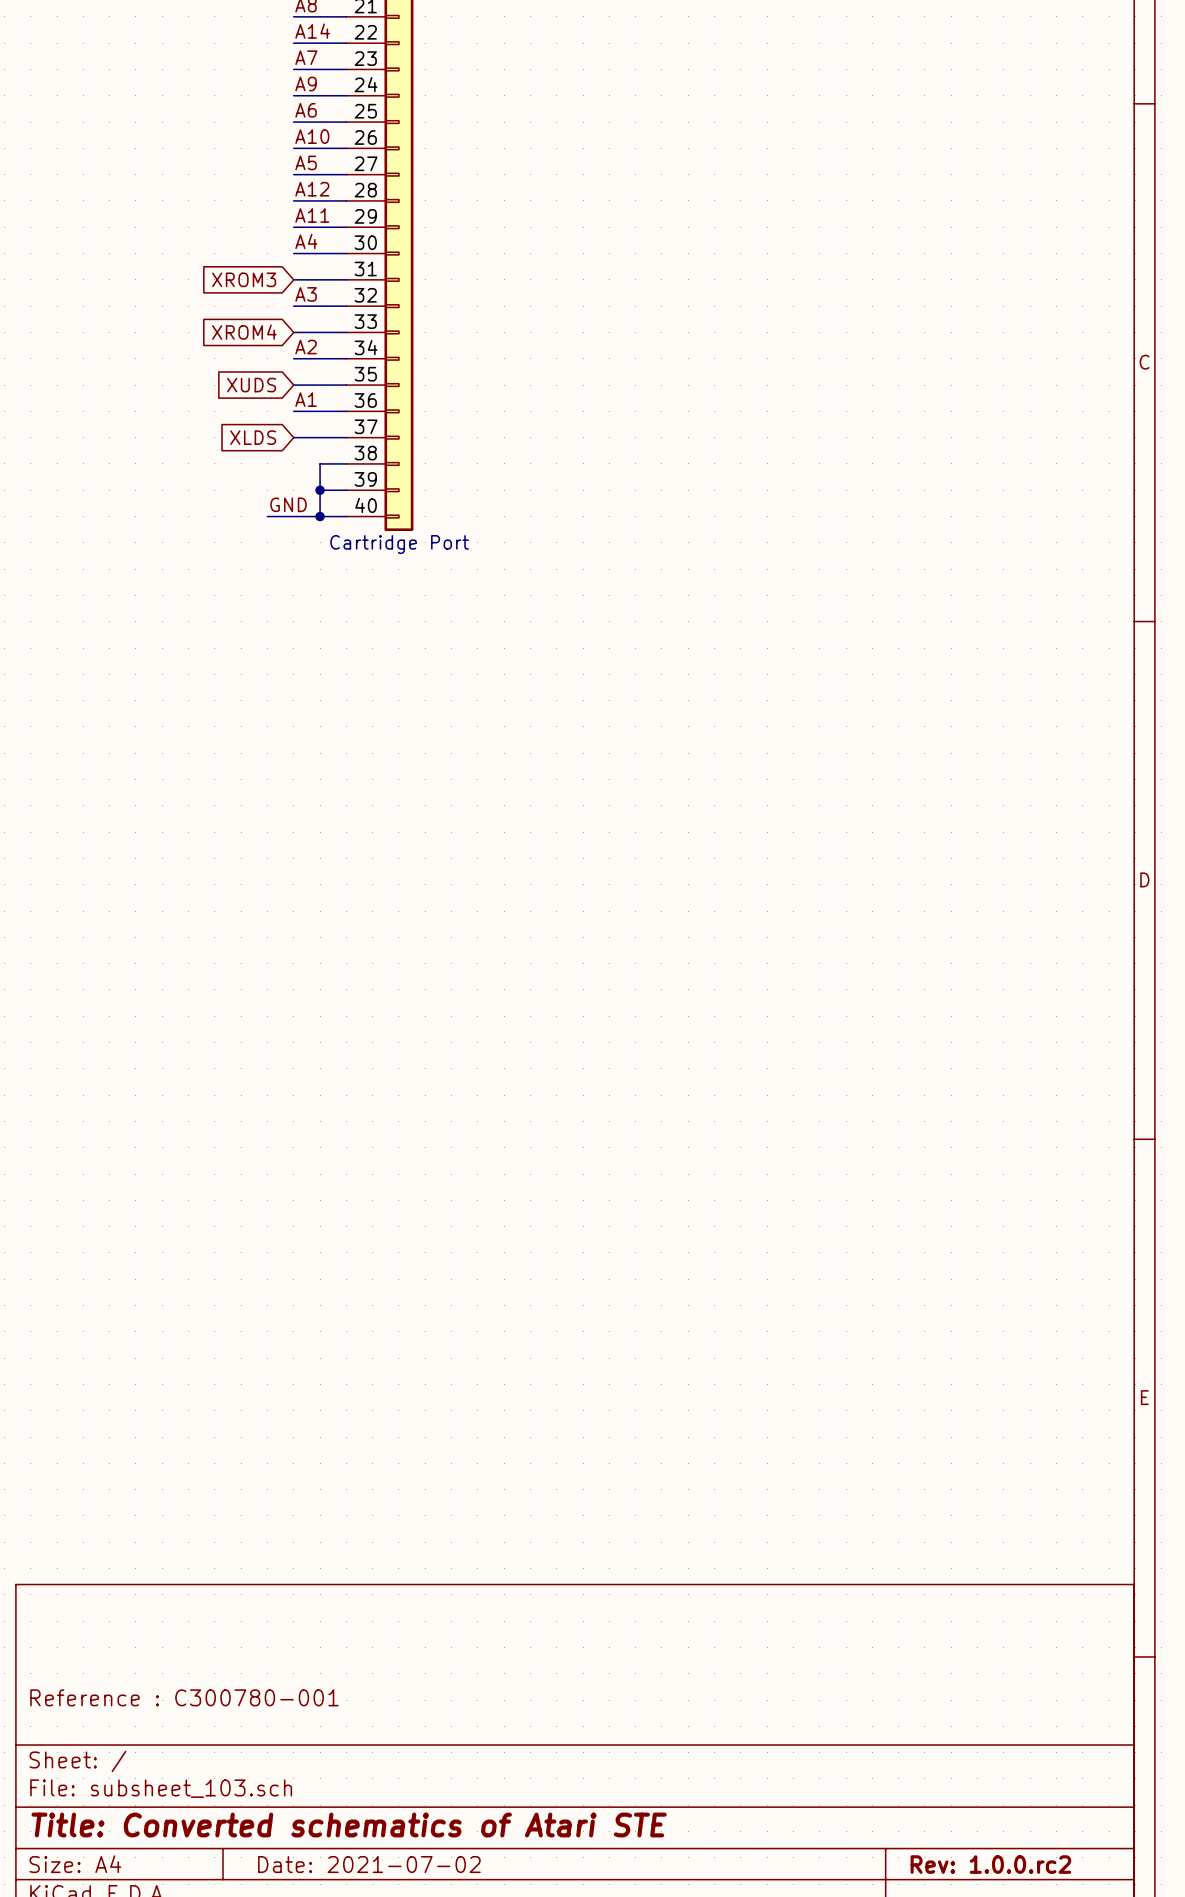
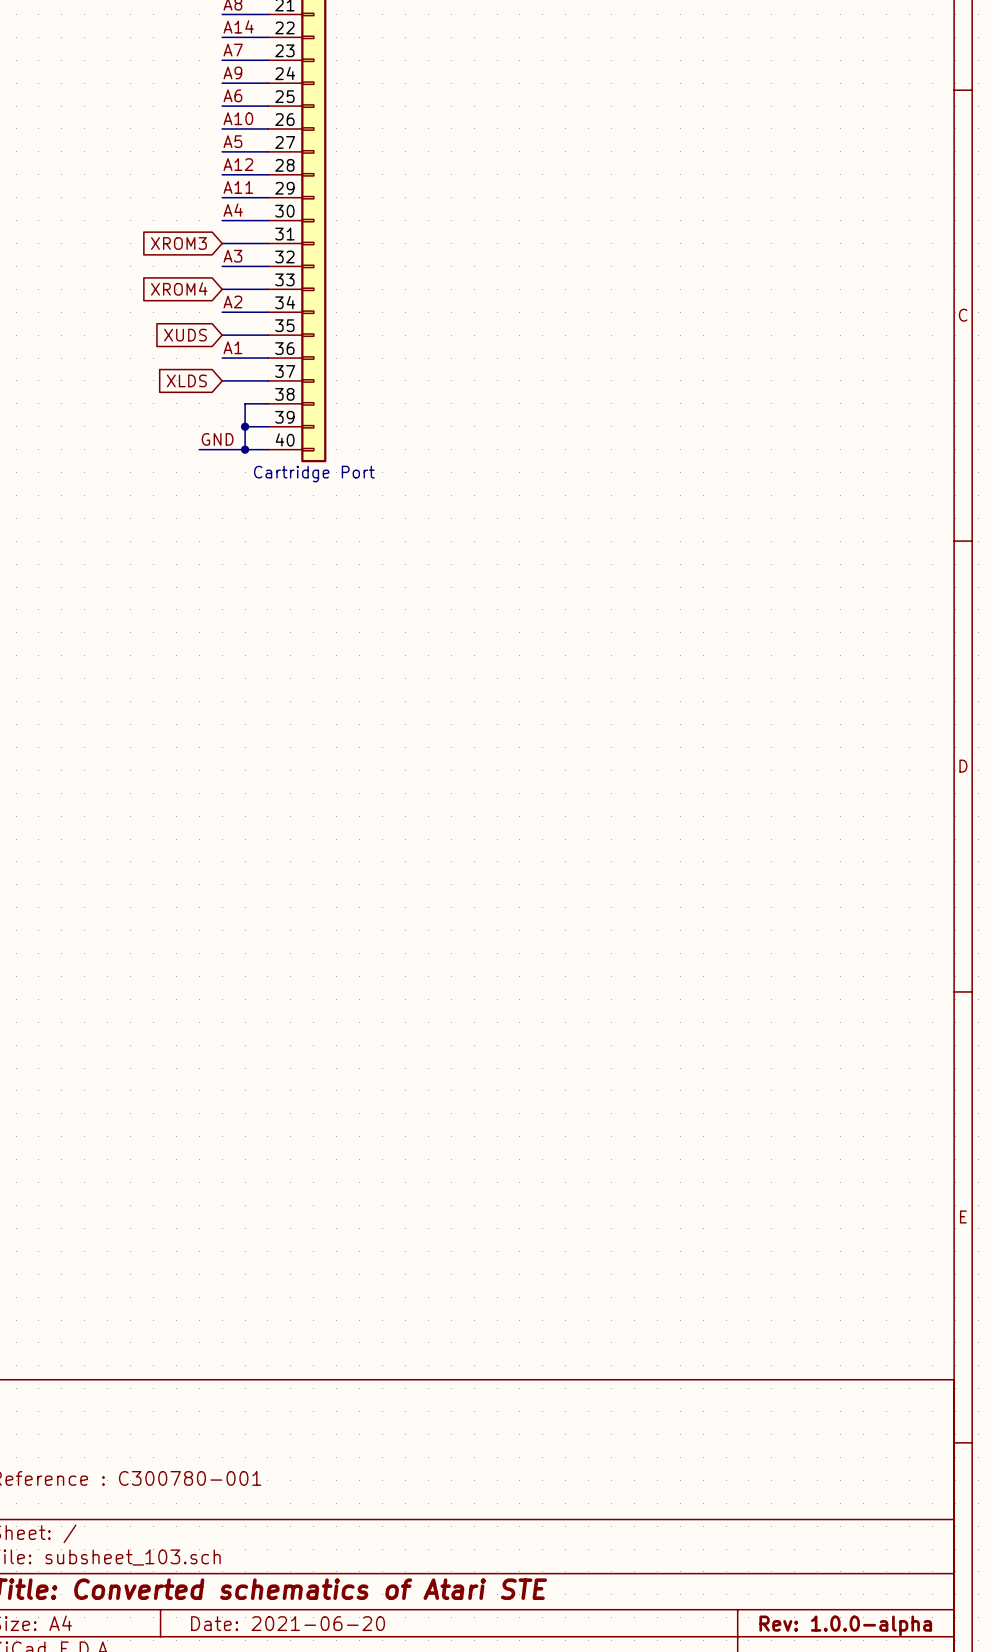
title block: Date: 2021-07-02 (369, 1864) -> Date: 2021-06-20 (288, 1623)
title block: Rev: 1.0.0.rc2 (990, 1864) -> Rev: 1.0.0-alpha (845, 1625)

